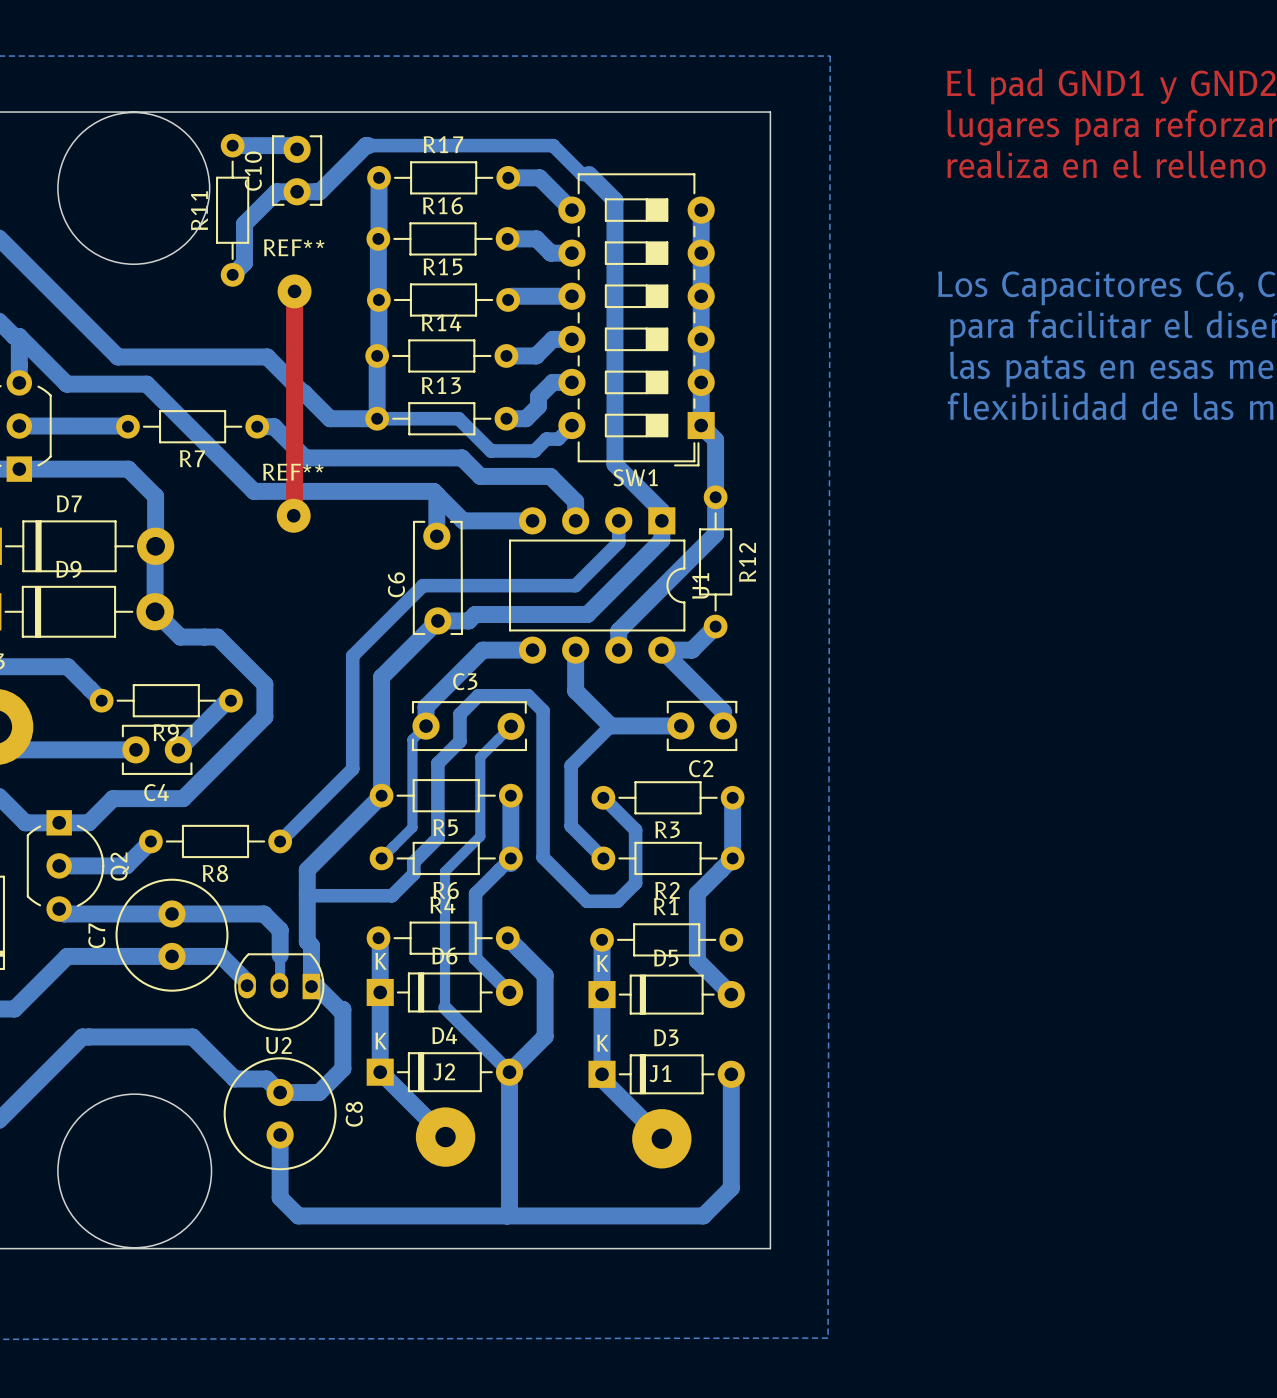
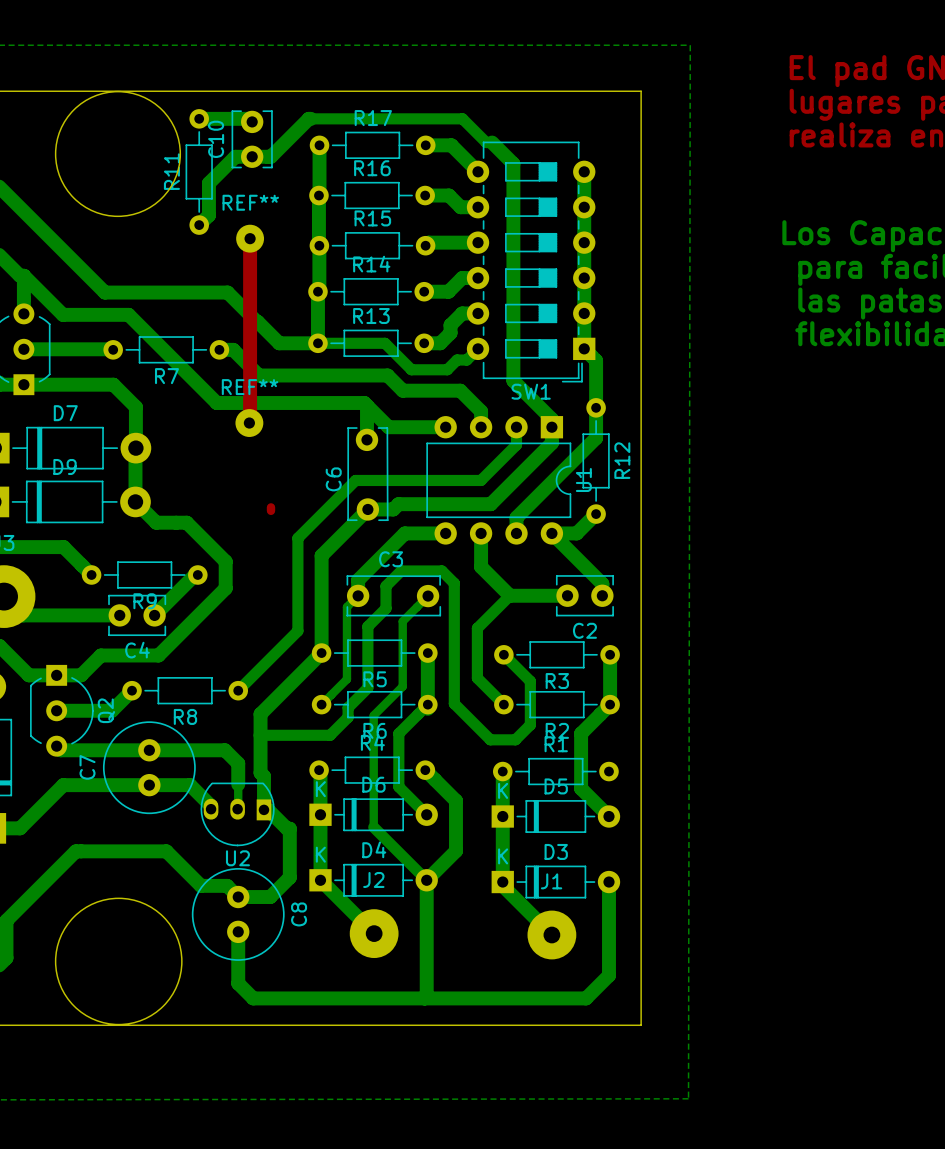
top track: none -> (271, 507) (271, 510)

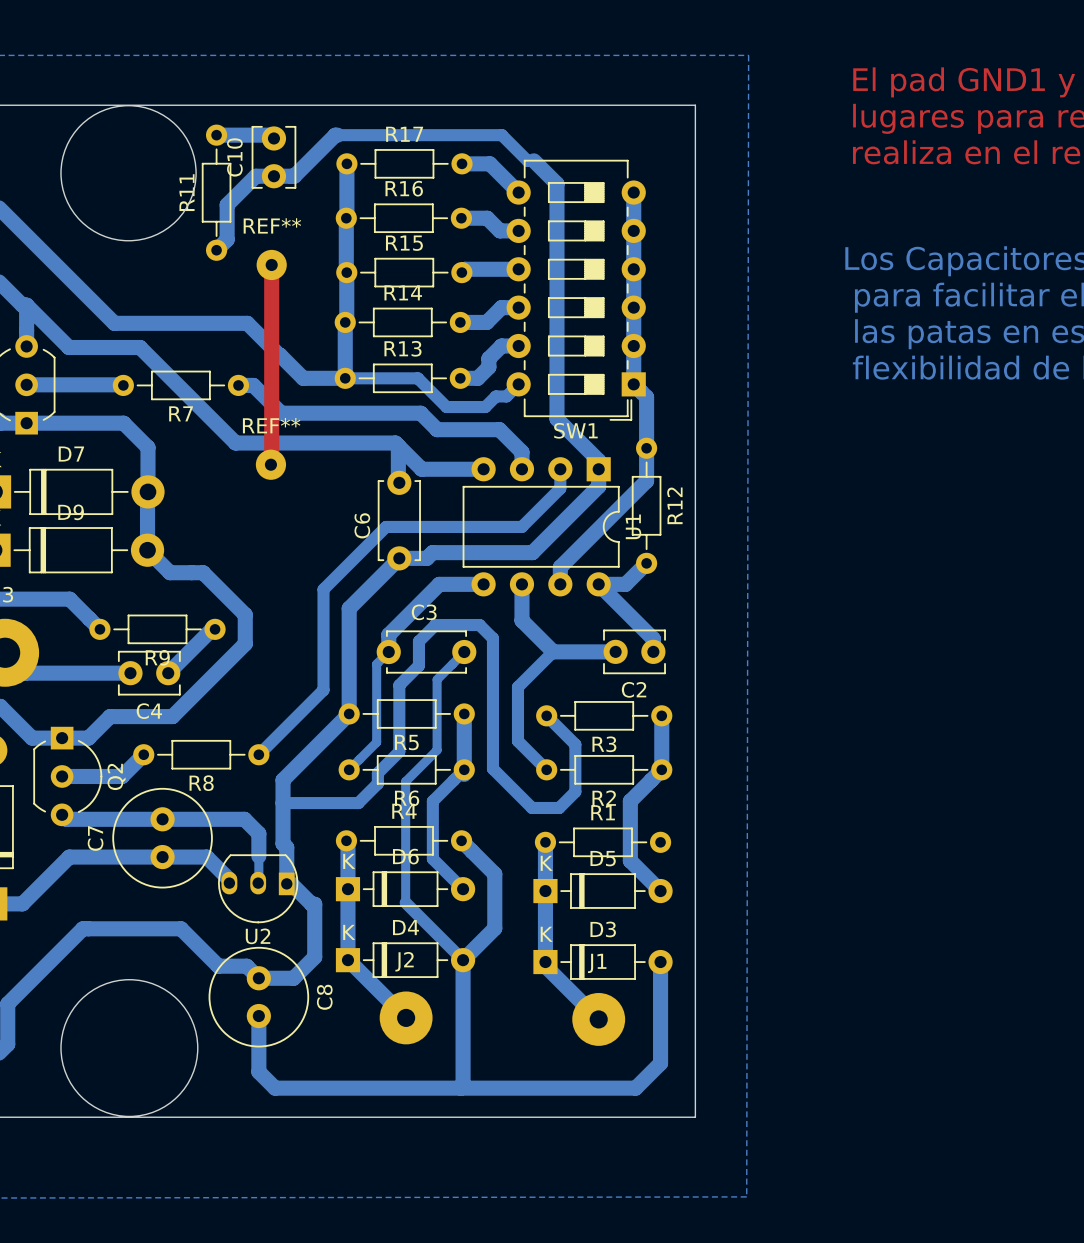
C6 footprint: [347, 427, 389, 522] -> [377, 470, 421, 571]
top track: (271, 507) (271, 510) -> none
C3 footprint: [346, 575, 442, 617] -> [376, 630, 477, 674]

